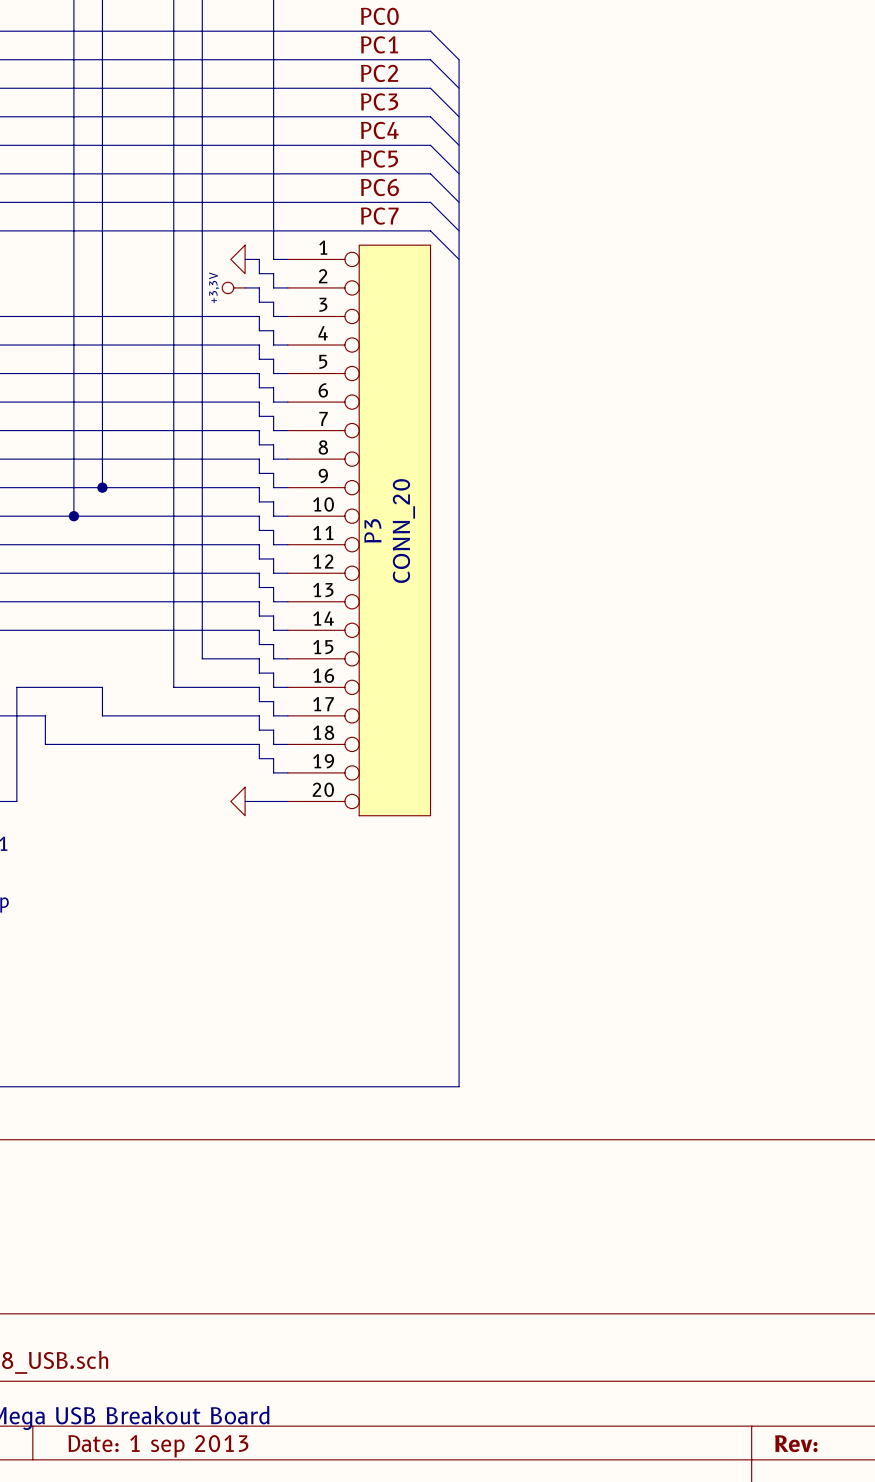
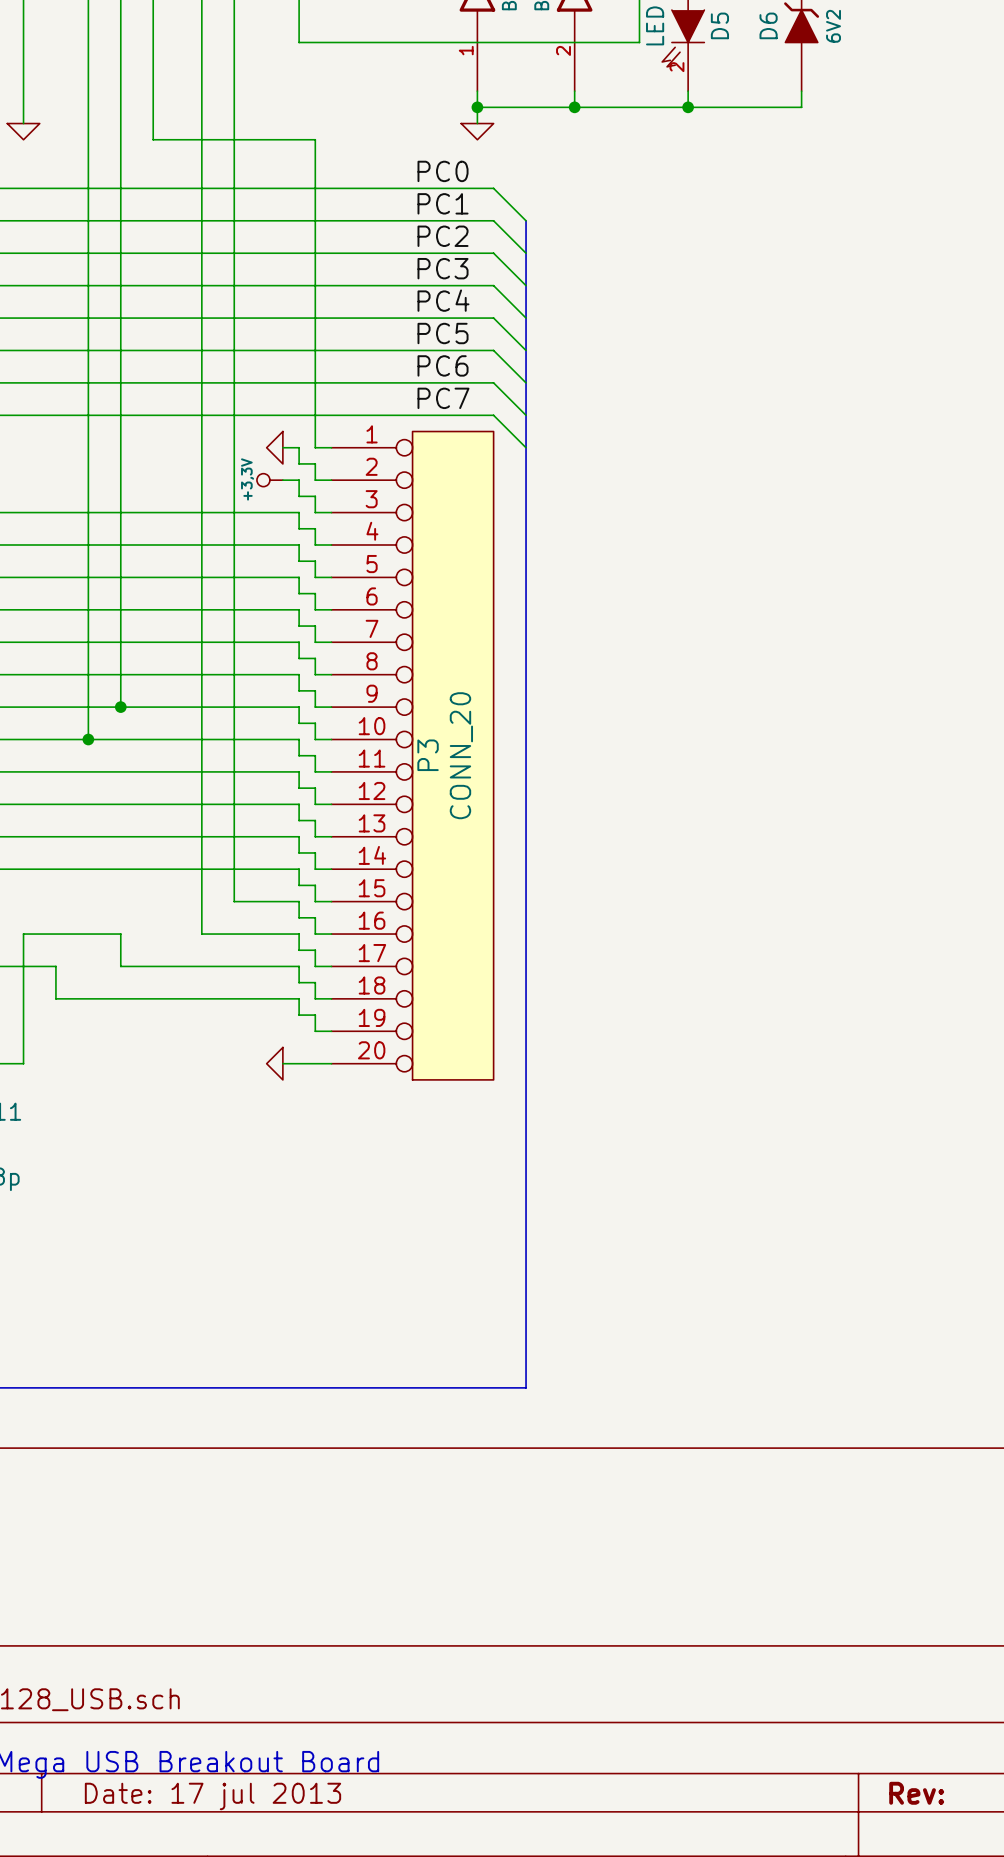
title block: Date: 1 sep 2013 (158, 1446) -> Date: 17 jul 2013 (212, 1796)

